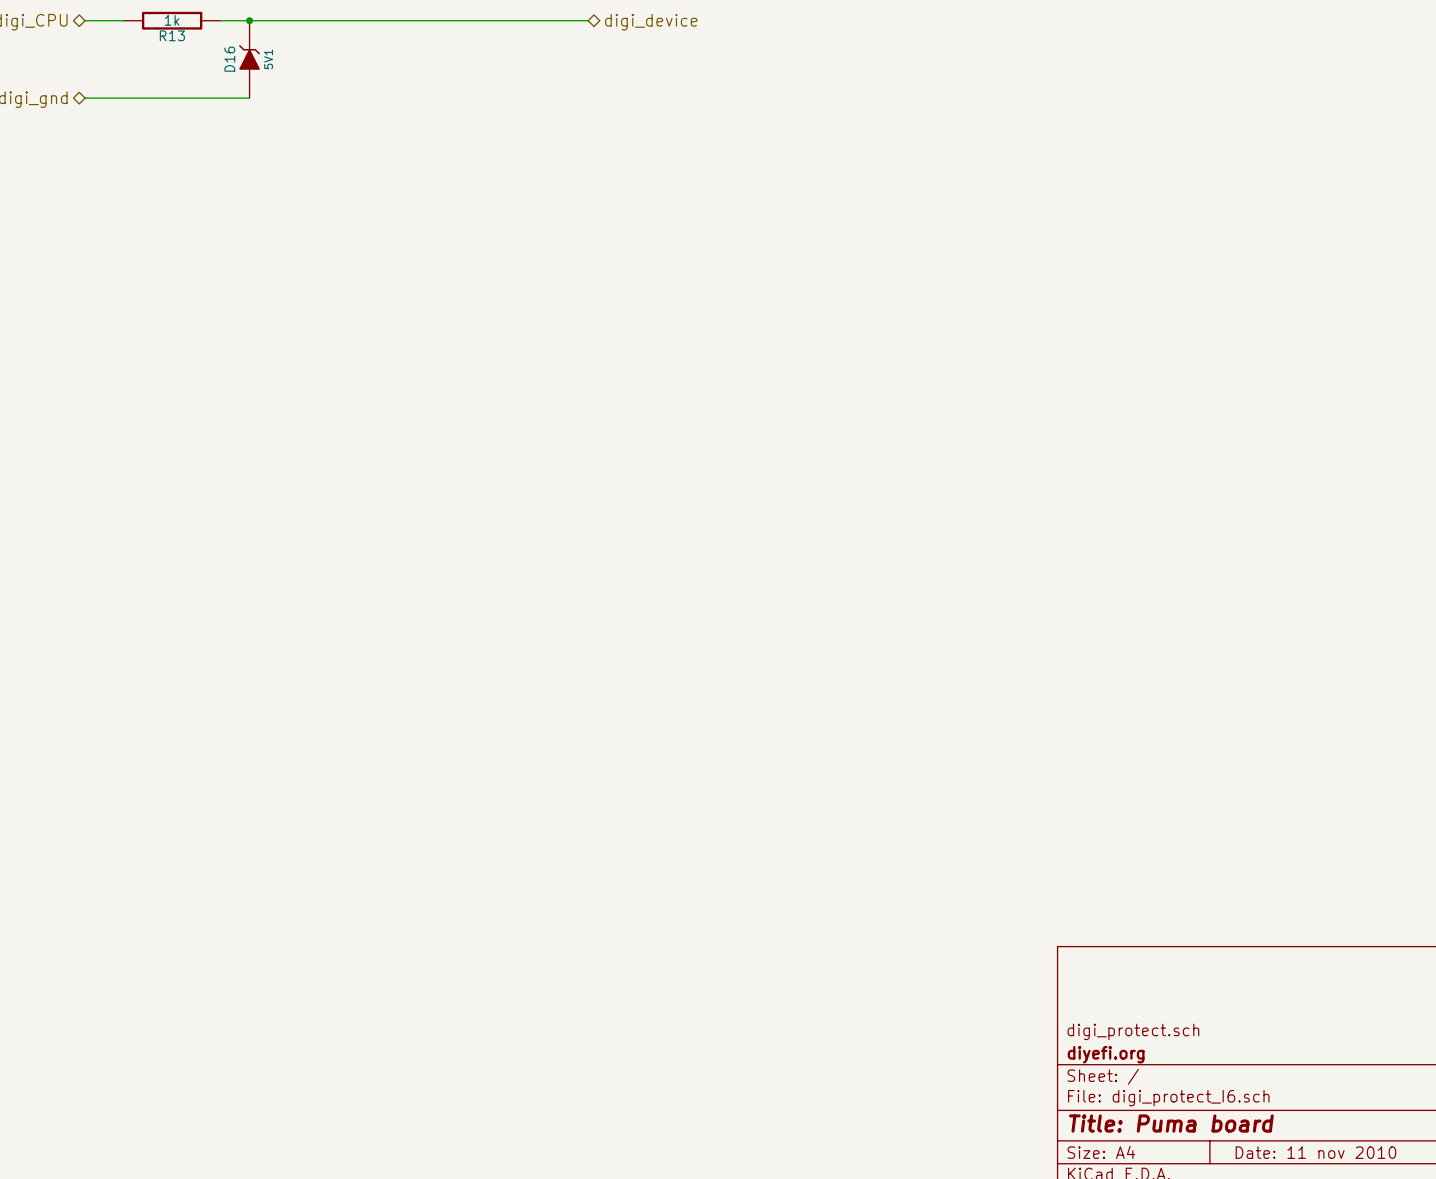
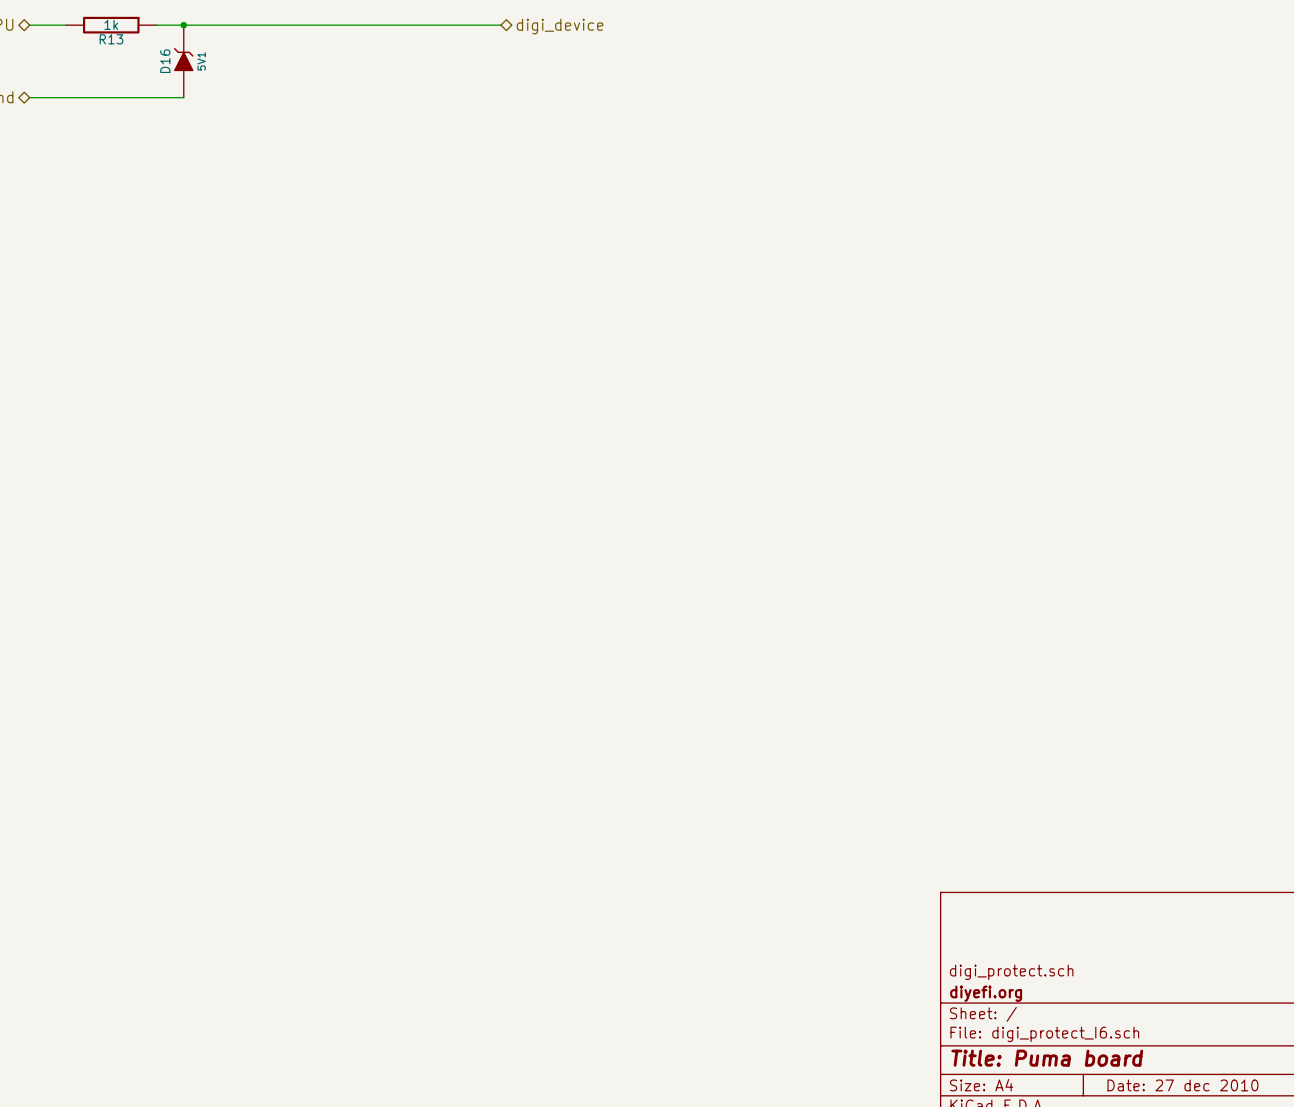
title block: Date: 11 nov 2010 (1315, 1152) -> Date: 27 dec 2010 (1182, 1085)

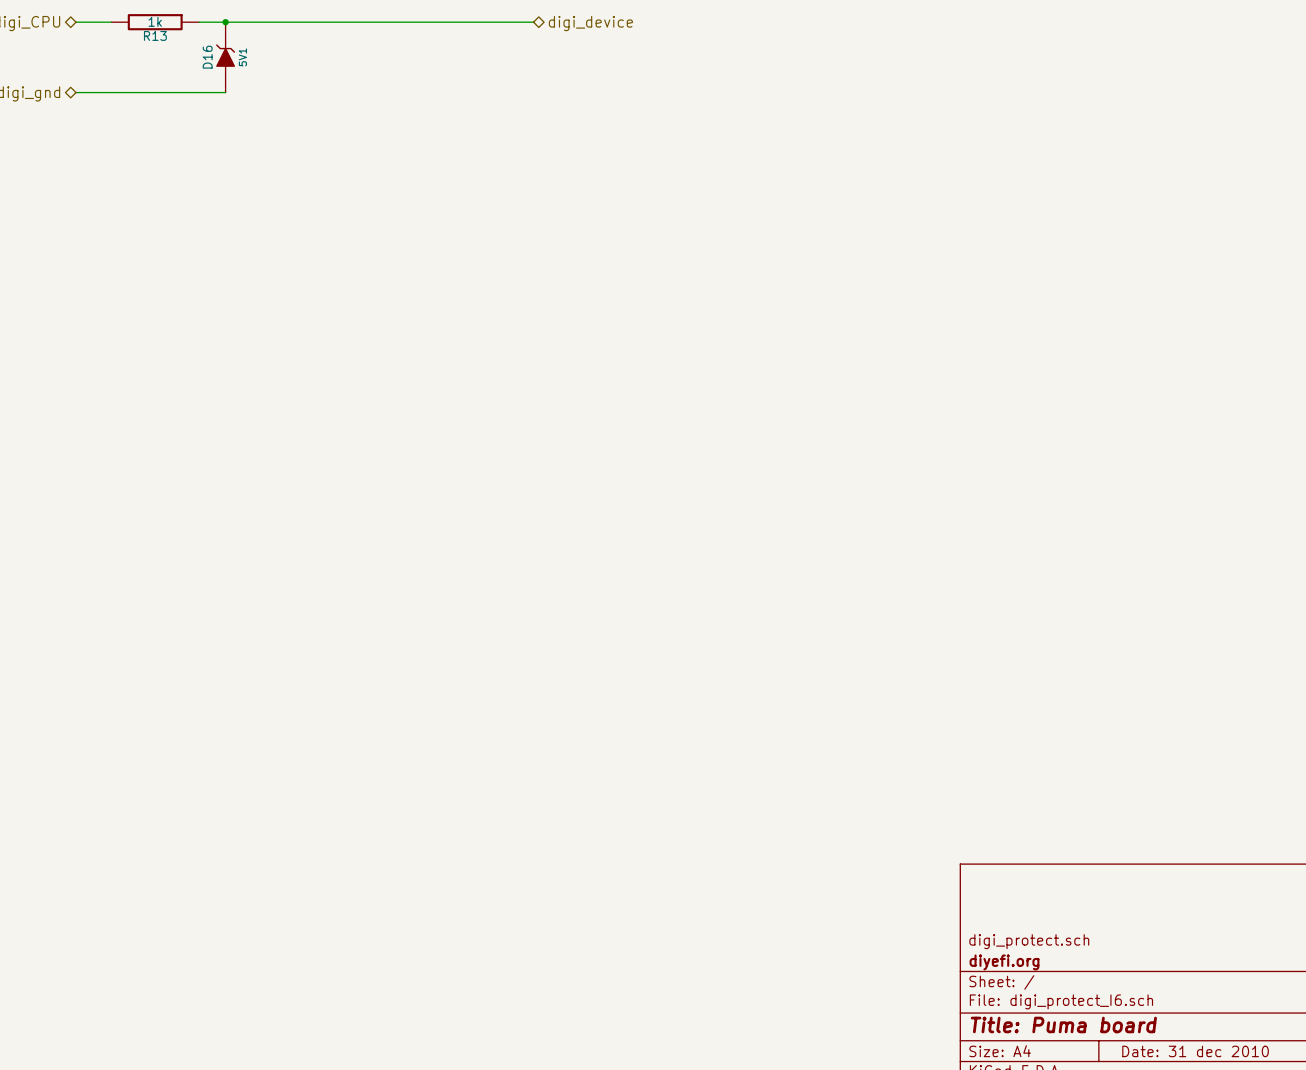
title block: Date: 27 dec 2010 (1182, 1085) -> Date: 31 dec 2010 (1195, 1051)

